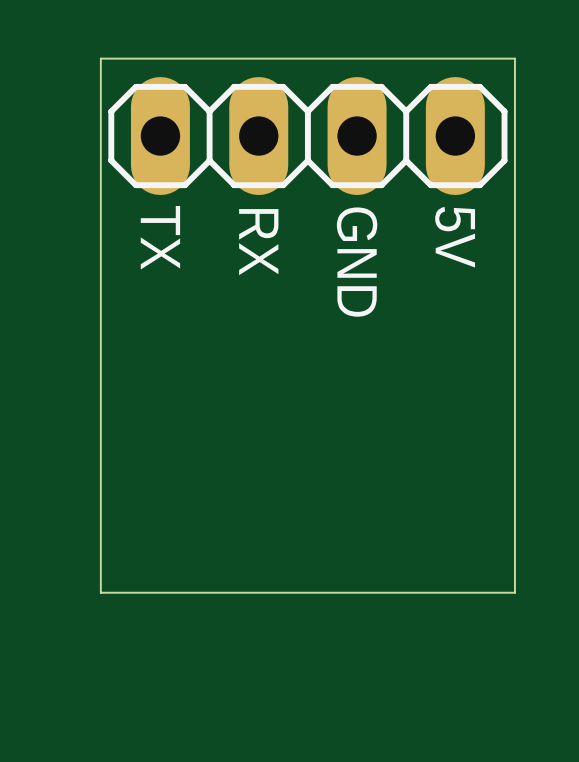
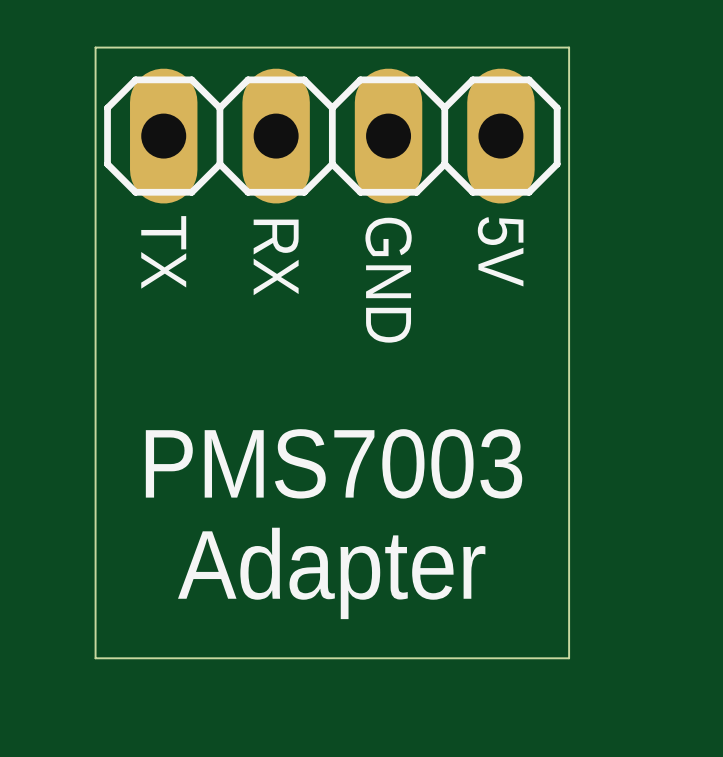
text: none -> PMS7003 (334, 463)
text: none -> Adapter (331, 573)

